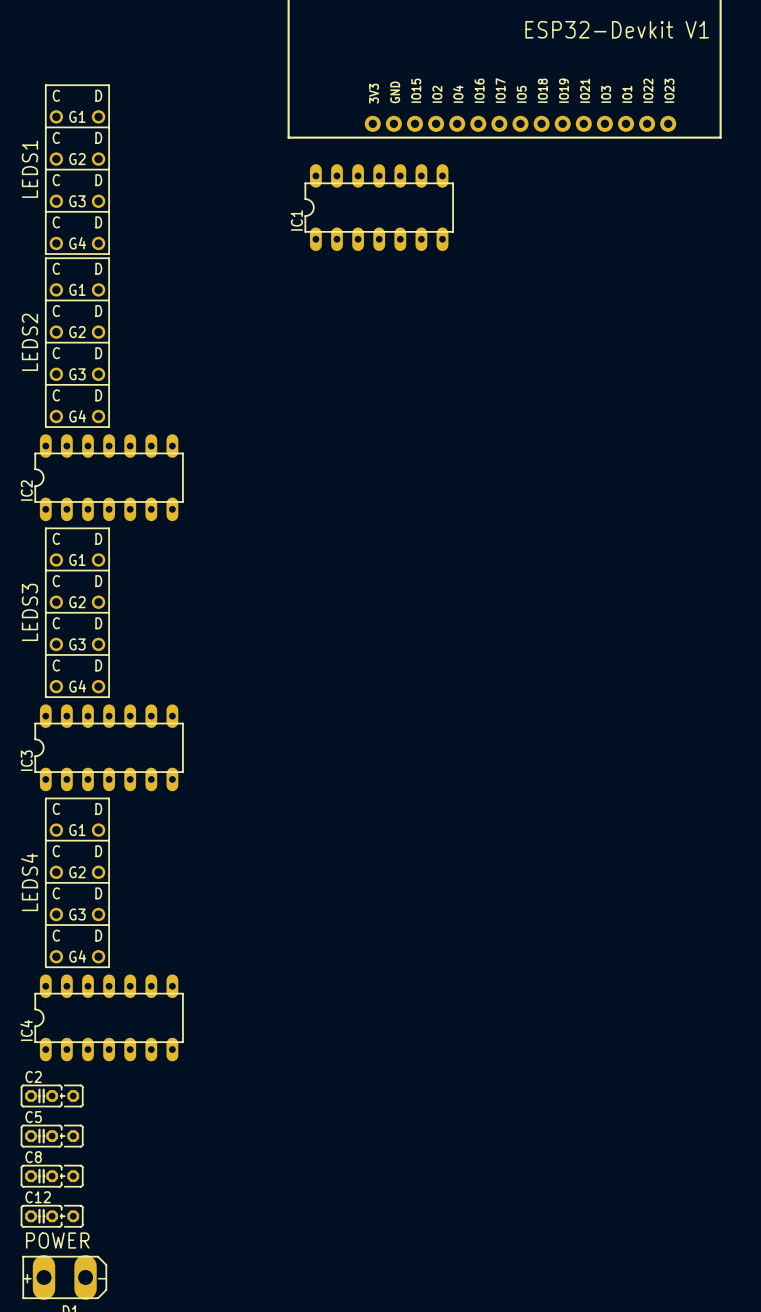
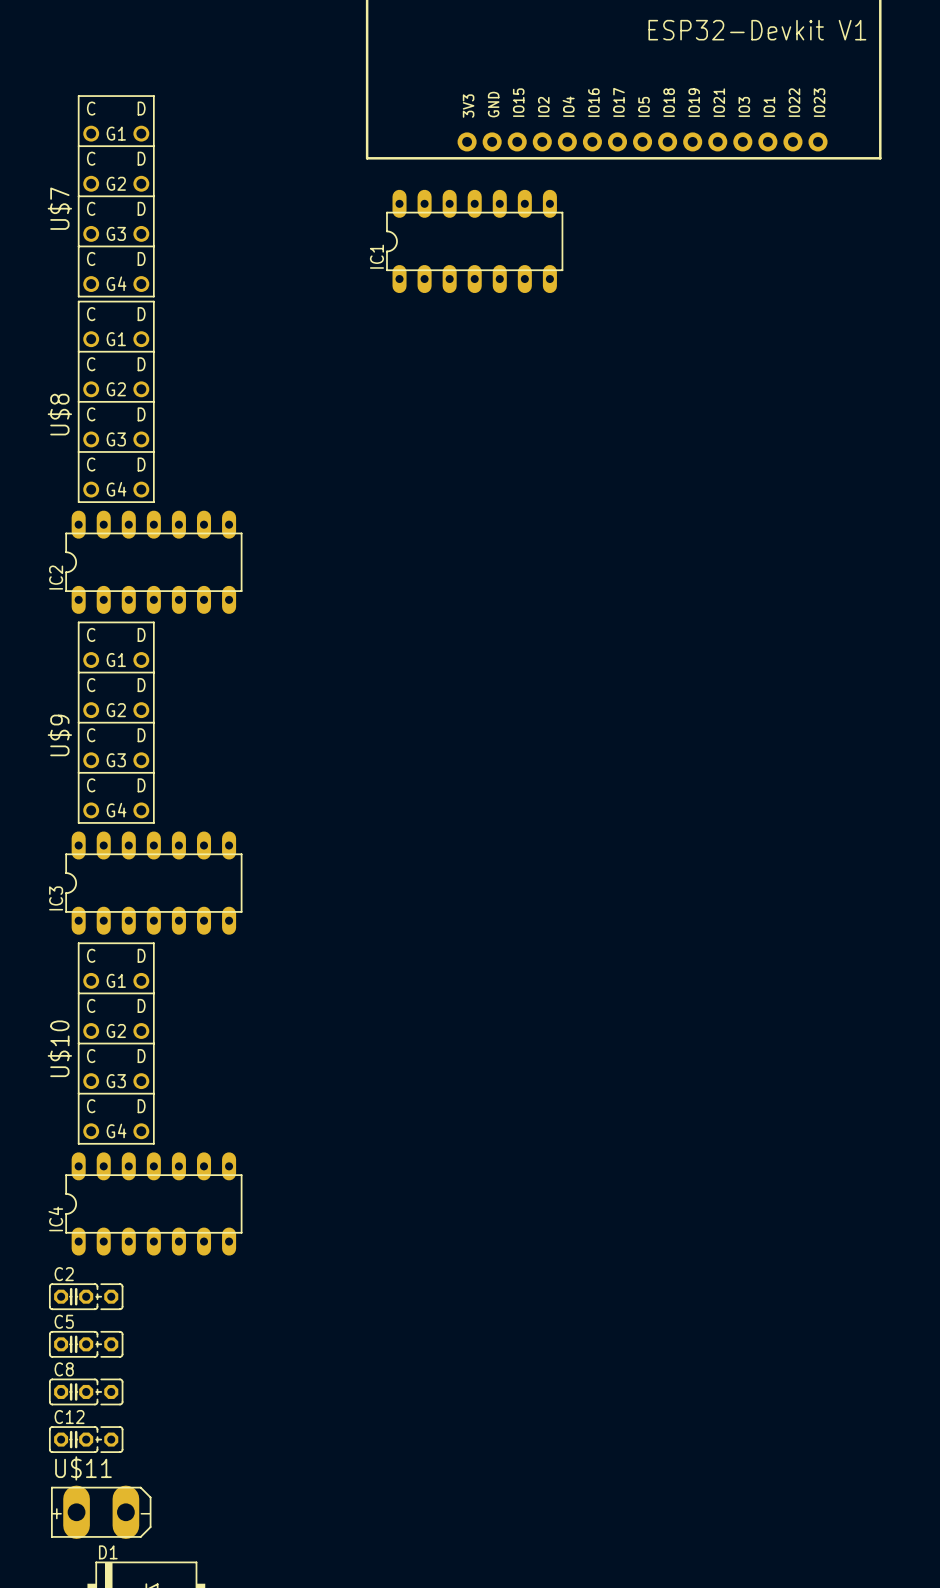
LEDS1 name: LEDS1 (29, 169) -> U$7 (59, 208)
LEDS2 name: LEDS2 (29, 342) -> U$8 (59, 414)
LEDS3 name: LEDS3 (29, 612) -> U$9 (59, 735)
LEDS4 name: LEDS4 (29, 882) -> U$10 (59, 1048)
POWER name: POWER (57, 1240) -> U$11 (83, 1468)

